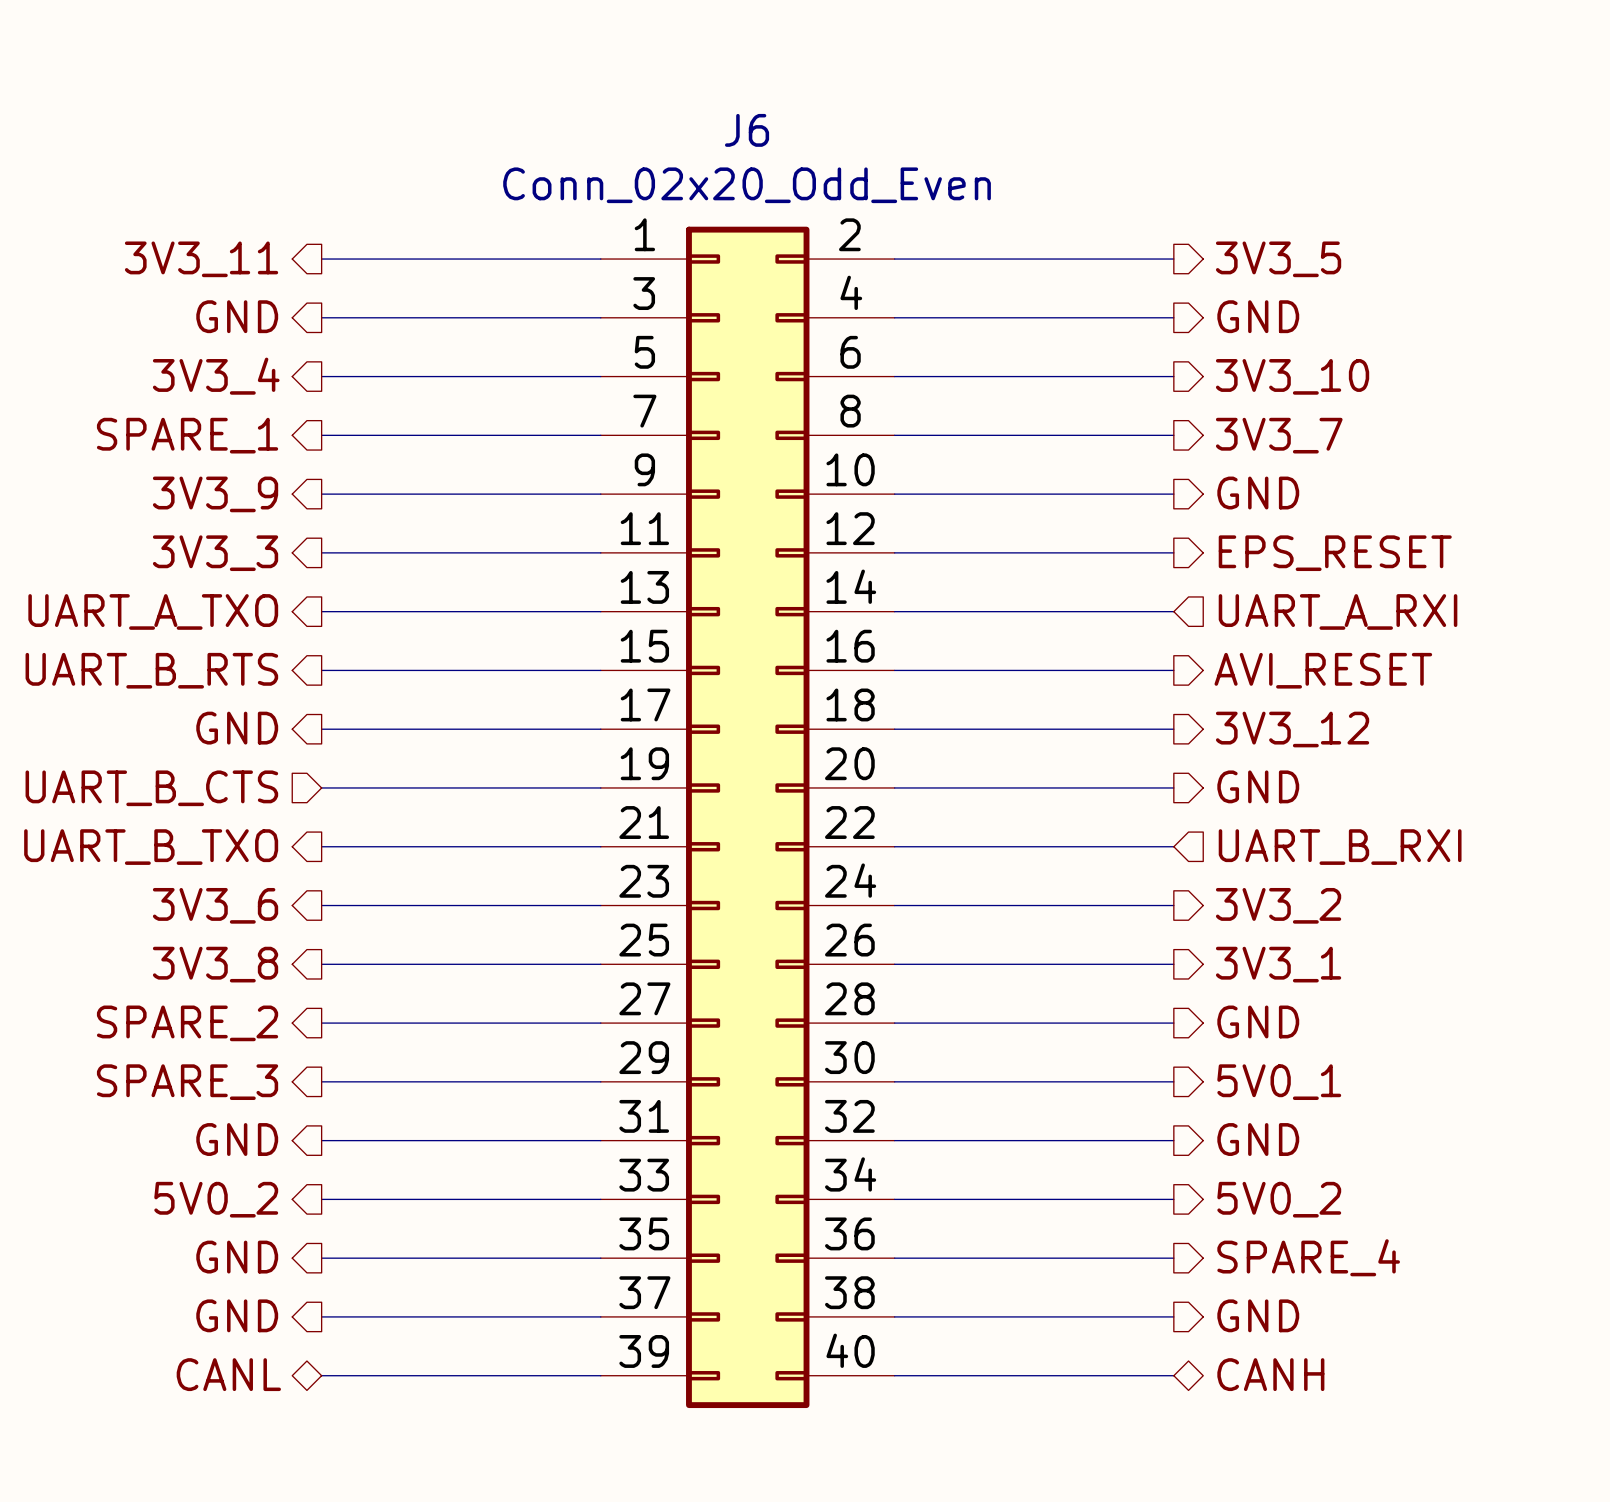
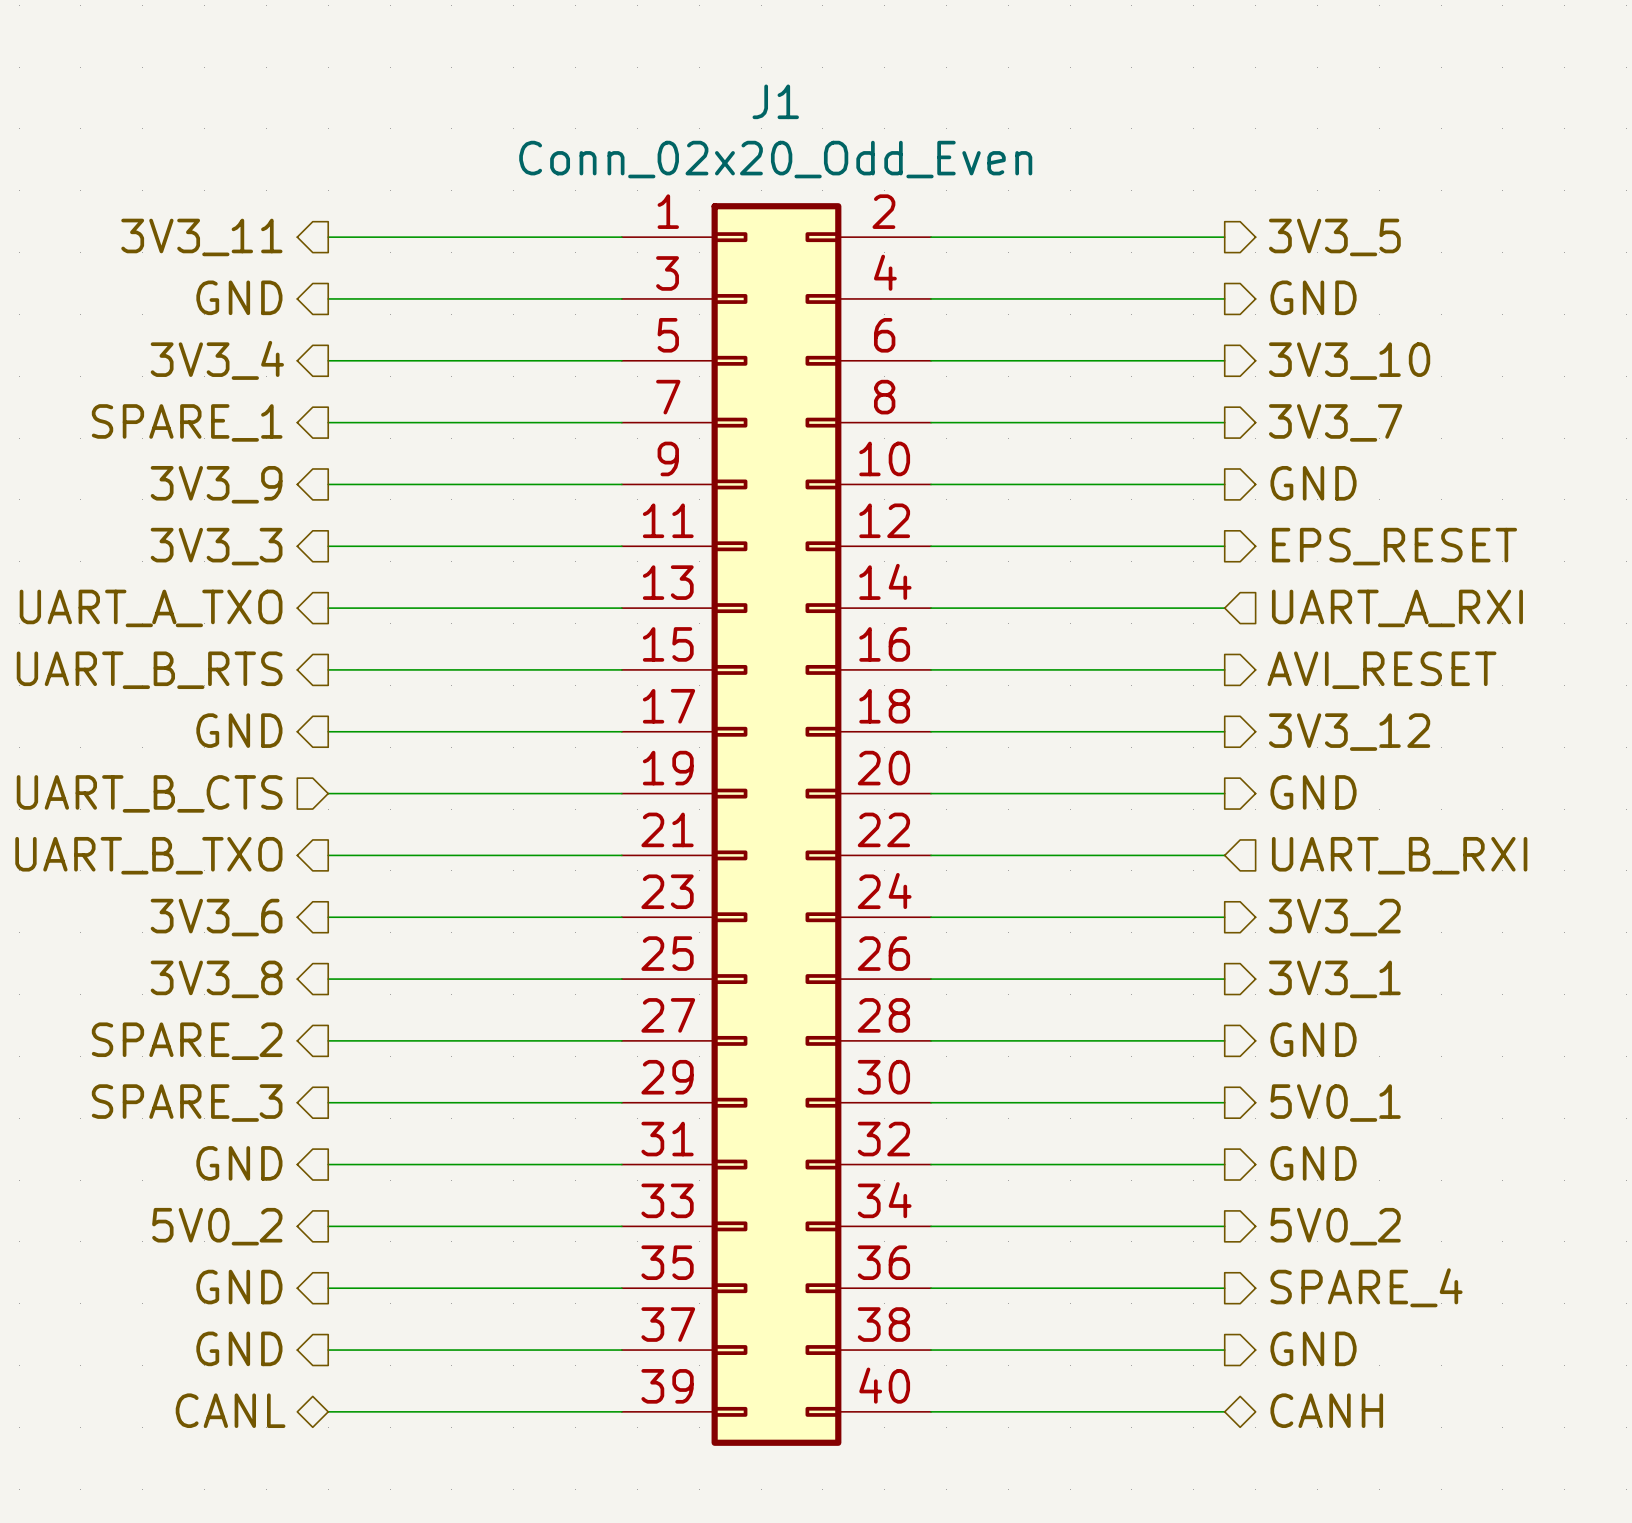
J6 name: J6 (747, 130) -> J1 (775, 101)

